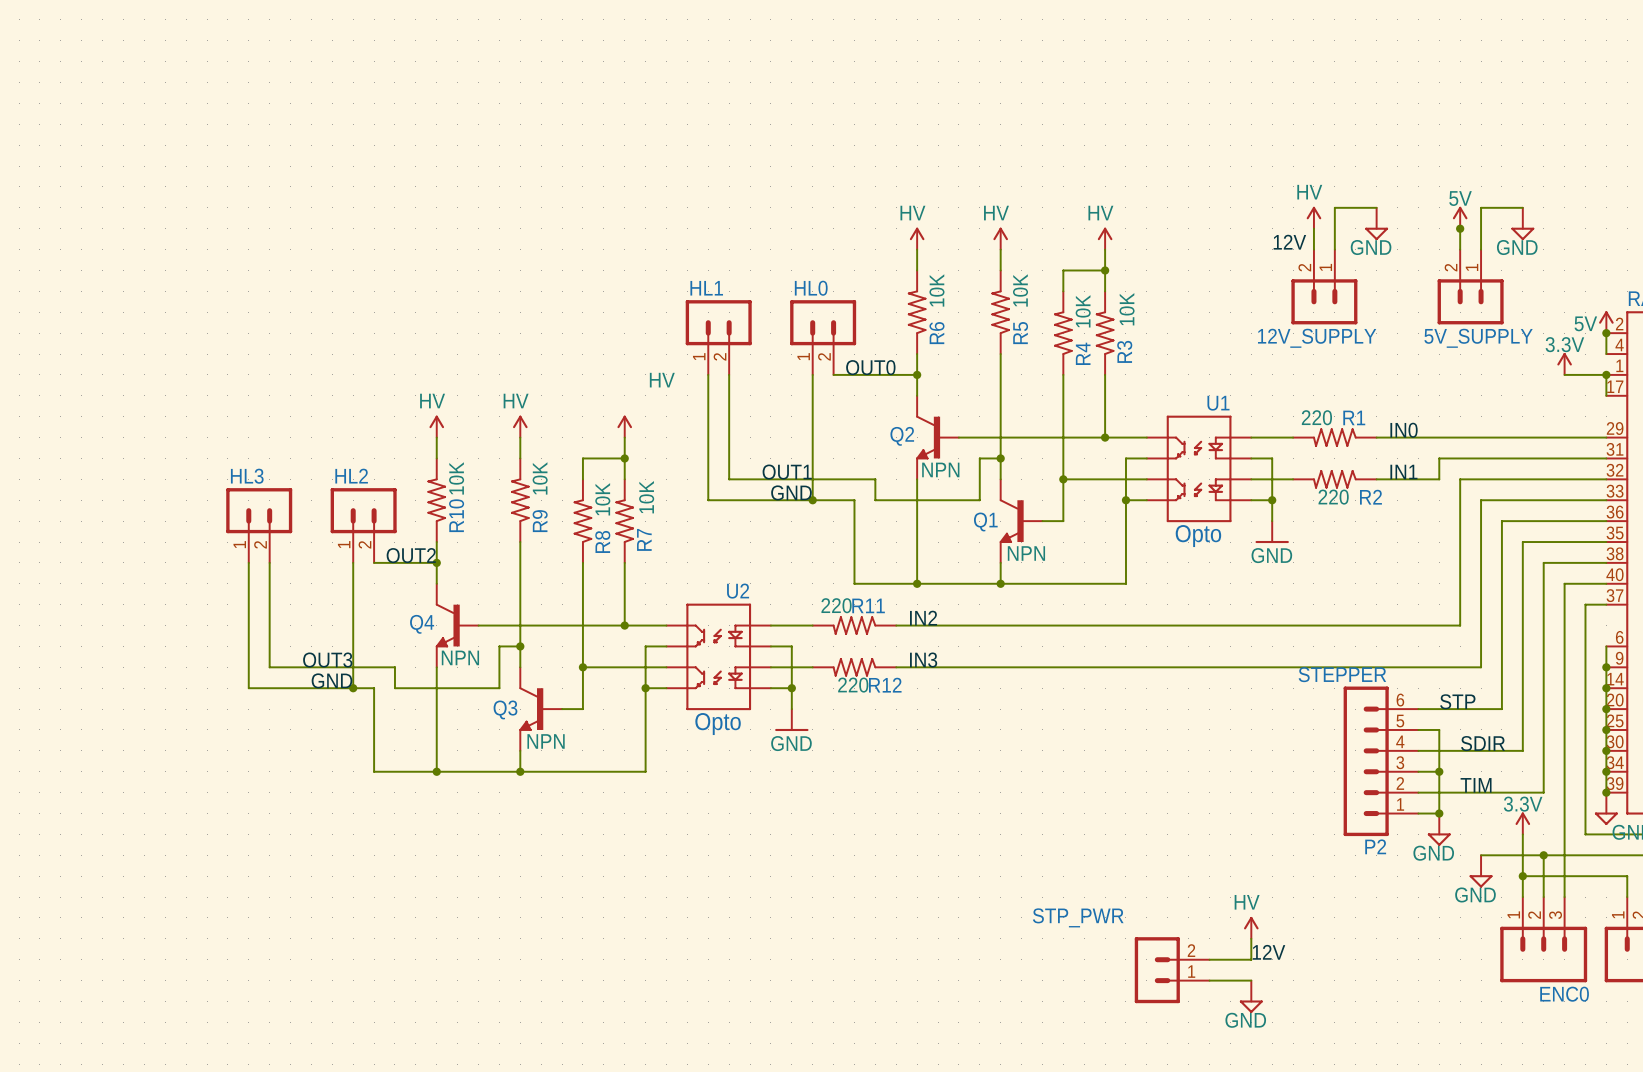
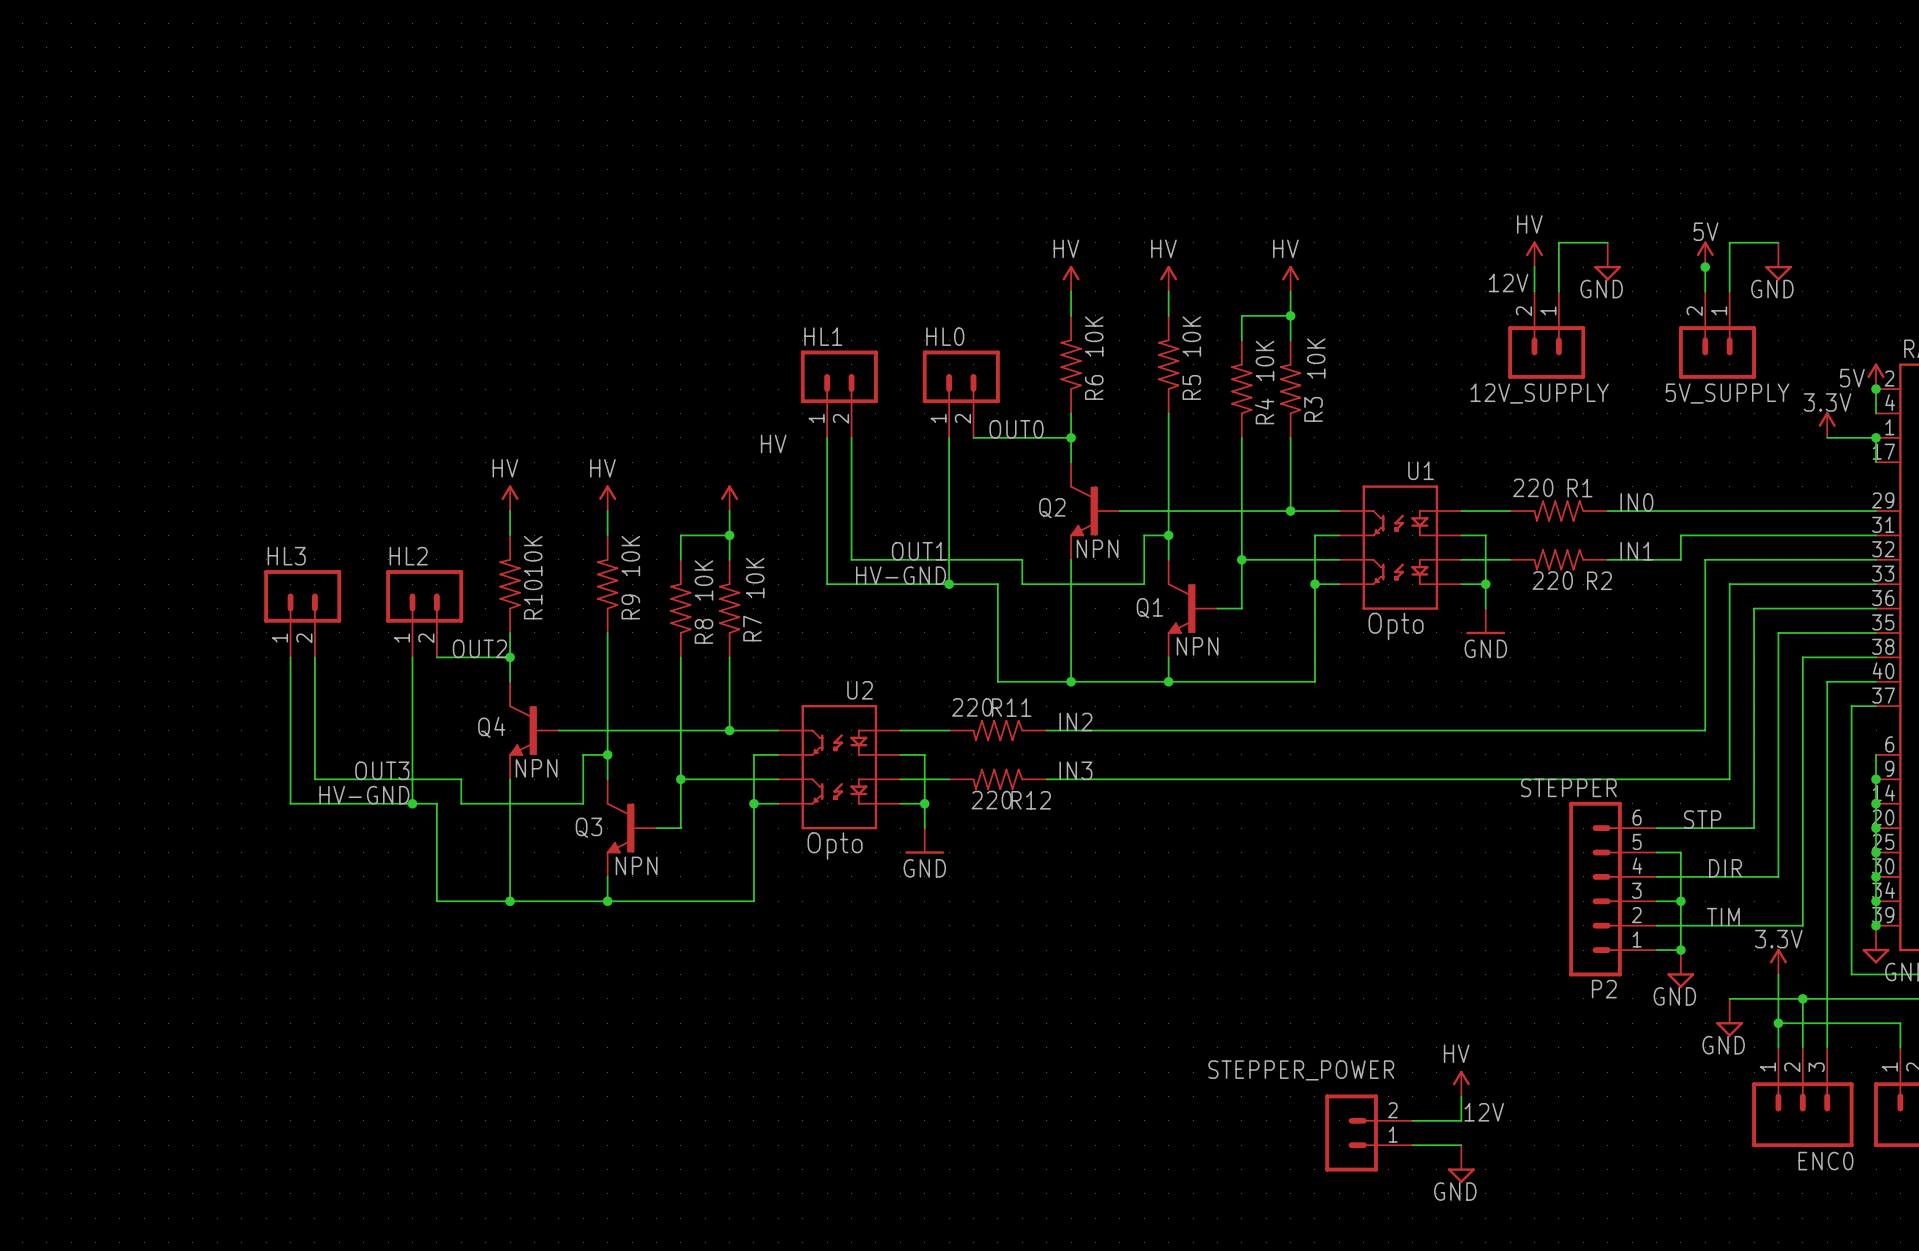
label: GND (791, 492) -> HV-GND (901, 575)
label: GND (331, 680) -> HV-GND (364, 795)
label: SDIR (1483, 743) -> DIR (1725, 868)
STP_PWR name: STP_PWR (1078, 917) -> STEPPER_POWER (1301, 1070)

